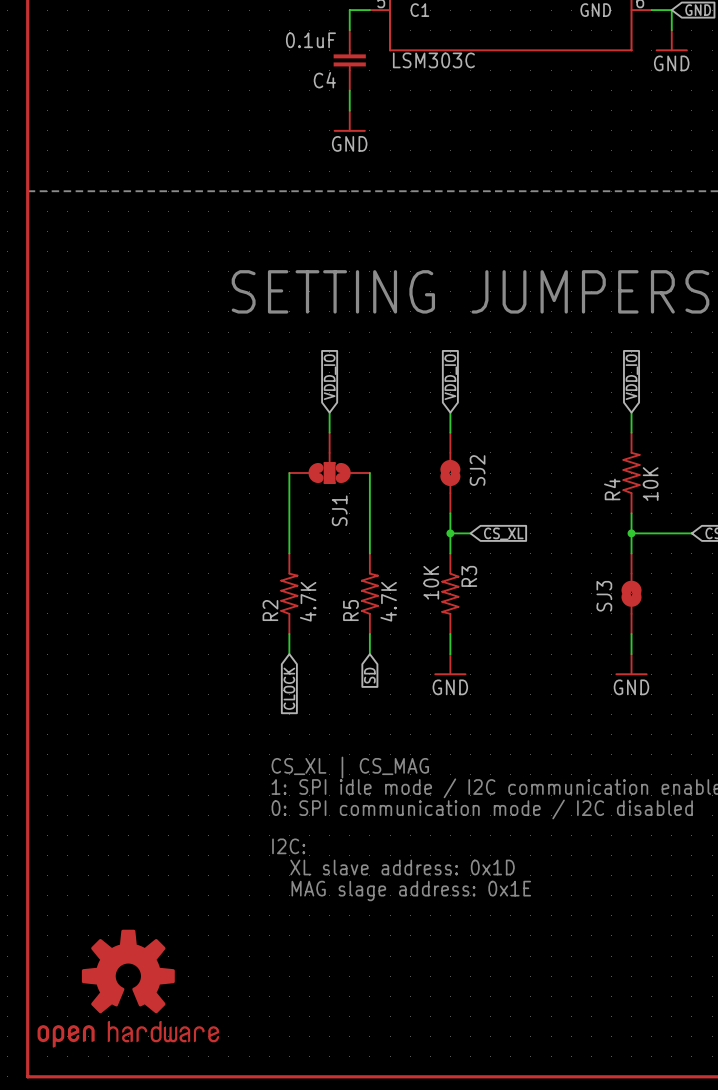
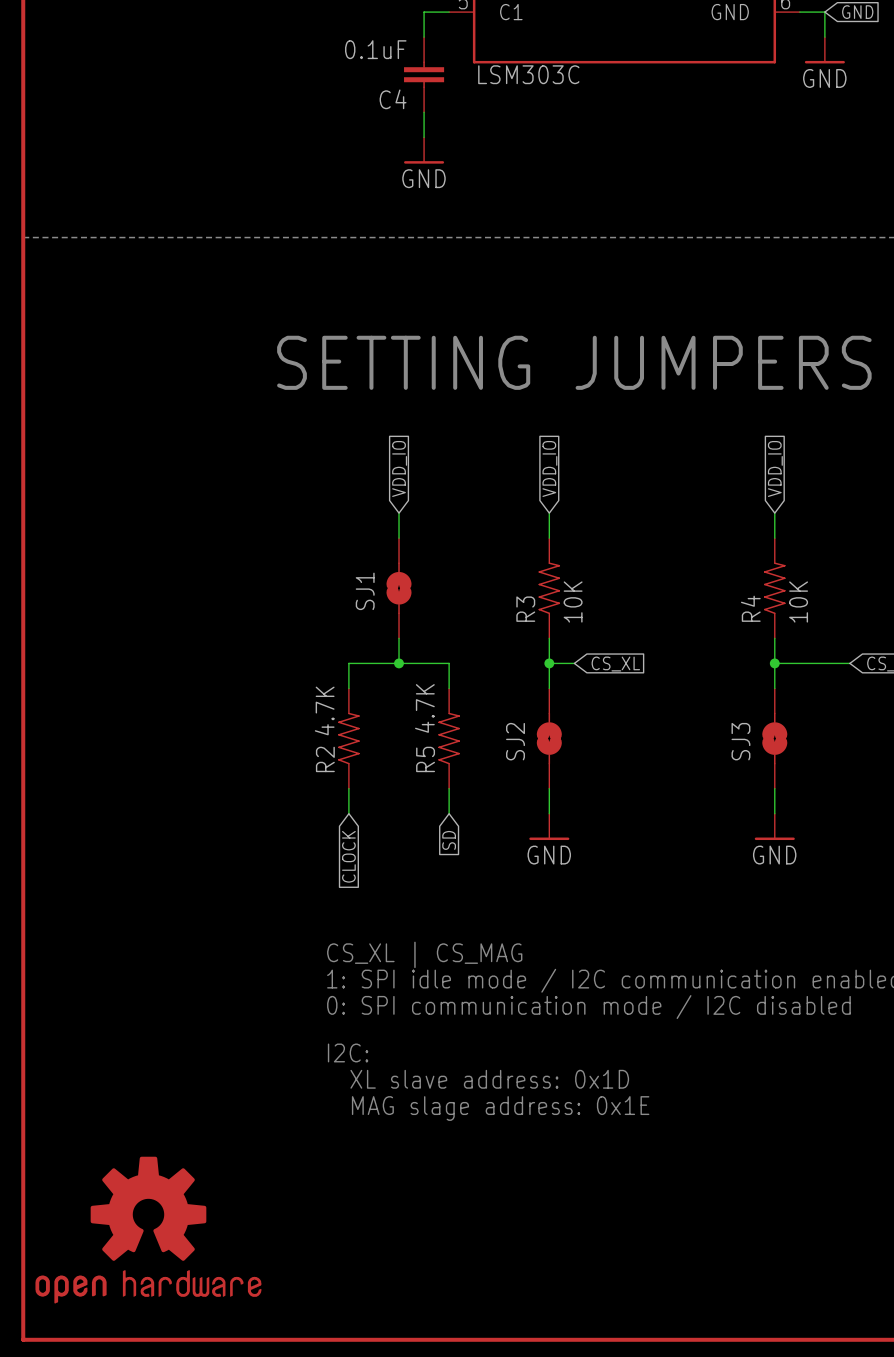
SJ1 symbol: [289, 432, 370, 484] -> [386, 538, 412, 639]
SJ2 name position: SJ2 (477, 470) -> SJ2 (515, 741)
wire: (289, 473) (289, 533) -> (449, 663) (348, 663)
wire: (369, 473) (369, 533) -> none
SJ2 position: (450, 473) -> (549, 738)
SJ1 name position: SJ1 (339, 510) -> SJ1 (365, 591)
wire: none -> (399, 638) (399, 663)
junction: none -> (399, 663)
R3 rotation: 0° (450, 593) -> 180° (549, 588)
R3 position: (450, 593) -> (549, 588)
R2 value position: 4.7K (308, 601) -> 4.7K (324, 710)
R5 value position: 4.7K (388, 601) -> 4.7K (424, 708)

